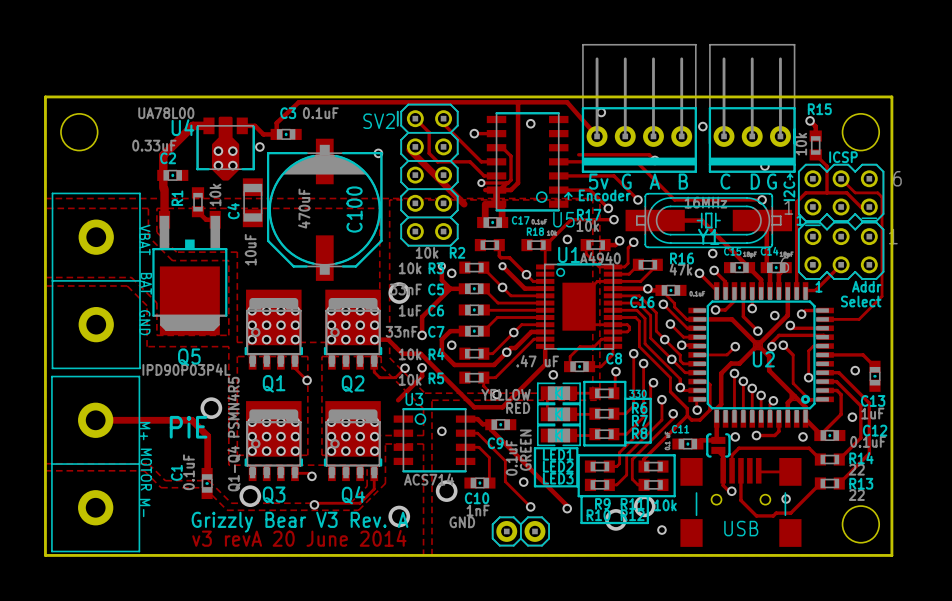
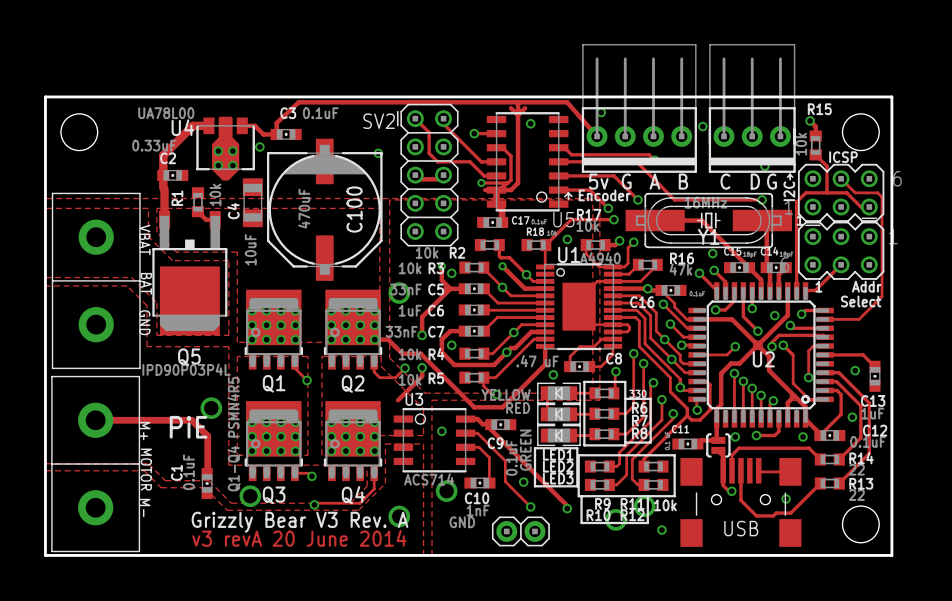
track: none -> (511, 108) (518, 115) (525, 108)
track: none -> (558, 147) (564, 147) (571, 154) (578, 154)
track: (409, 149) (464, 204) -> none
track: none -> (415, 179) (443, 179)
track: (485, 204) (483, 222) -> none

